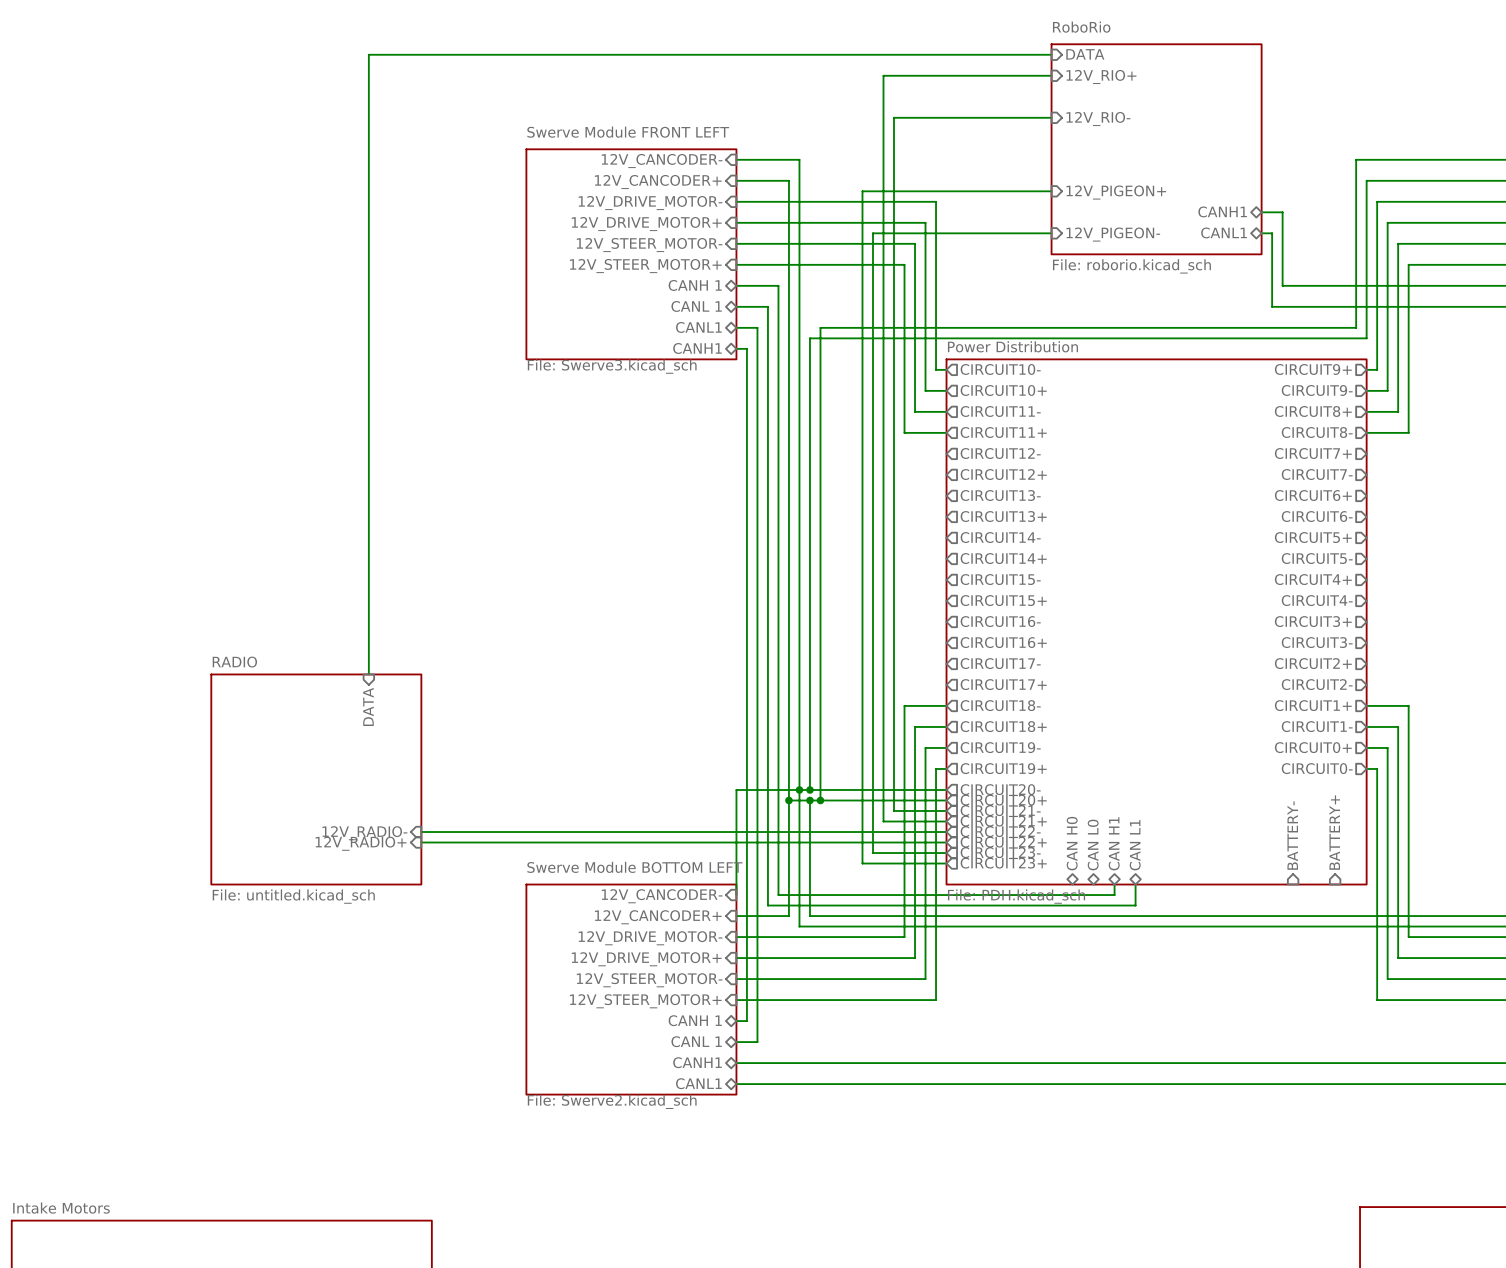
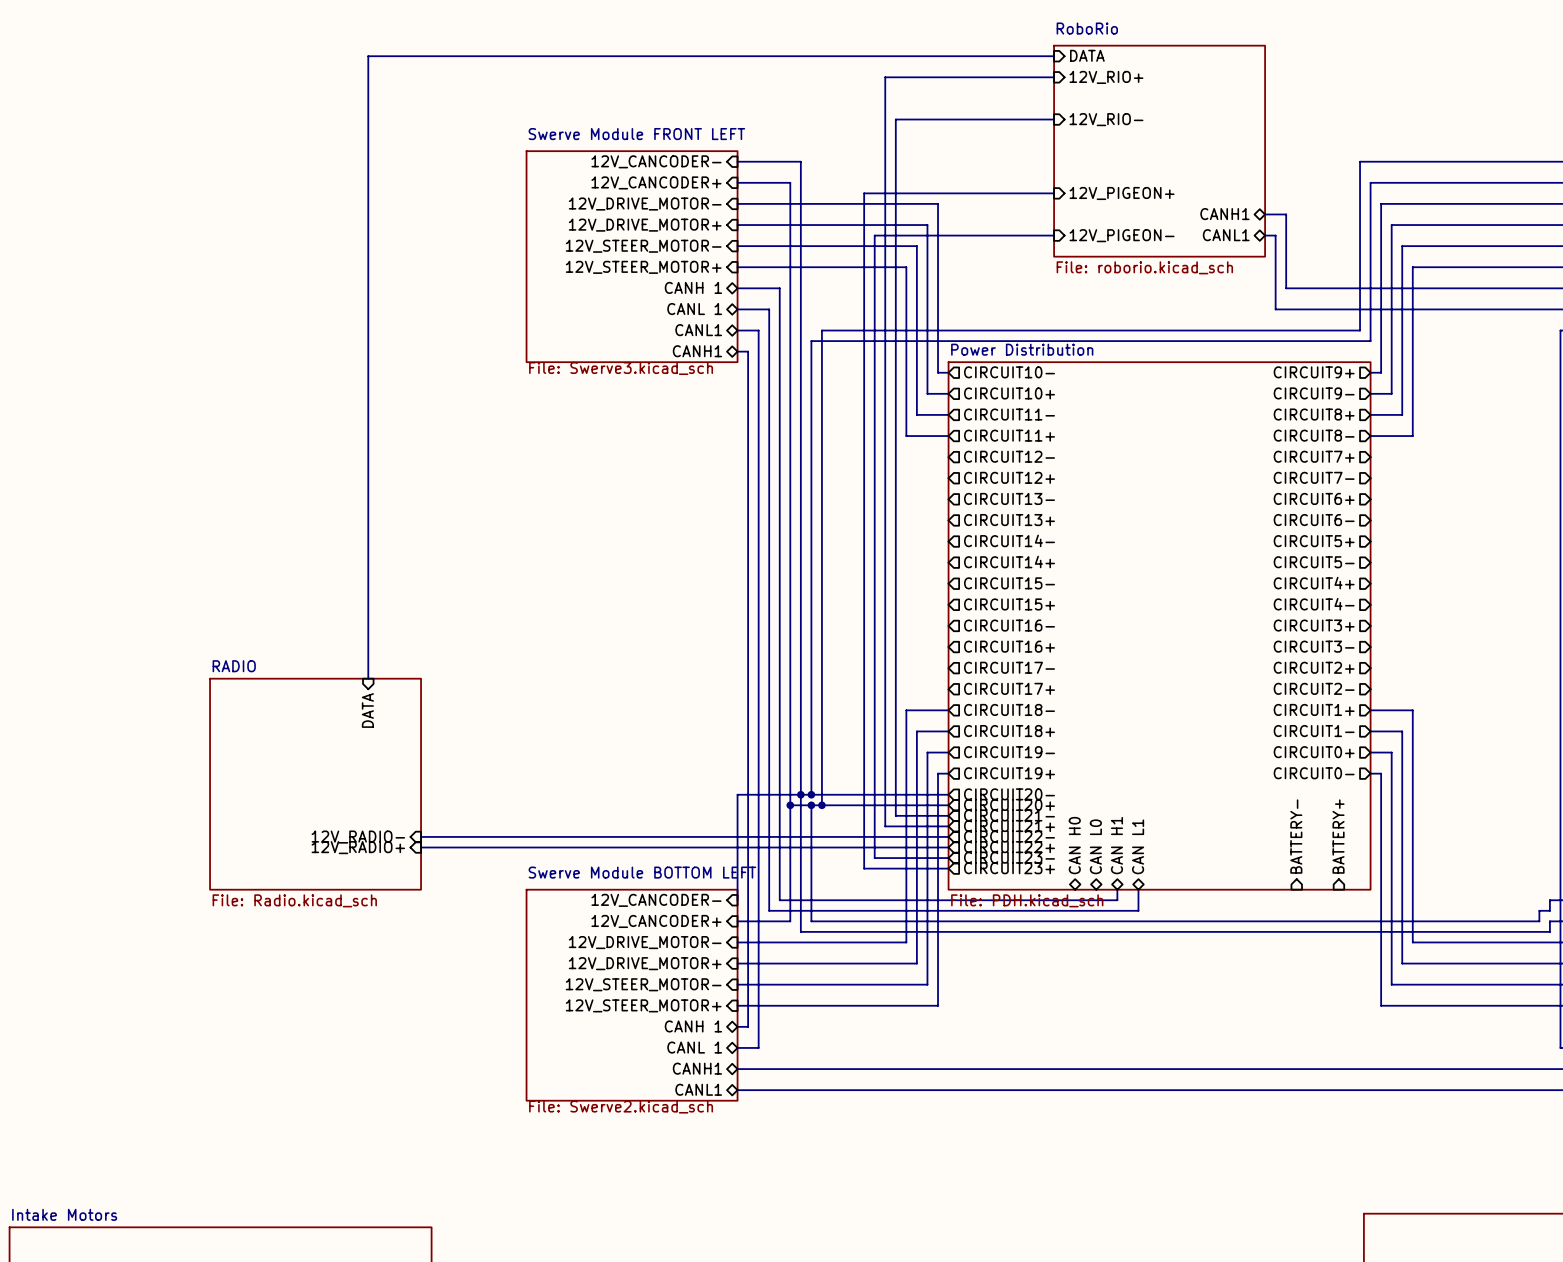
sheet RADIO value: File: untitled.kicad_sch (293, 896) -> File: Radio.kicad_sch (294, 900)

